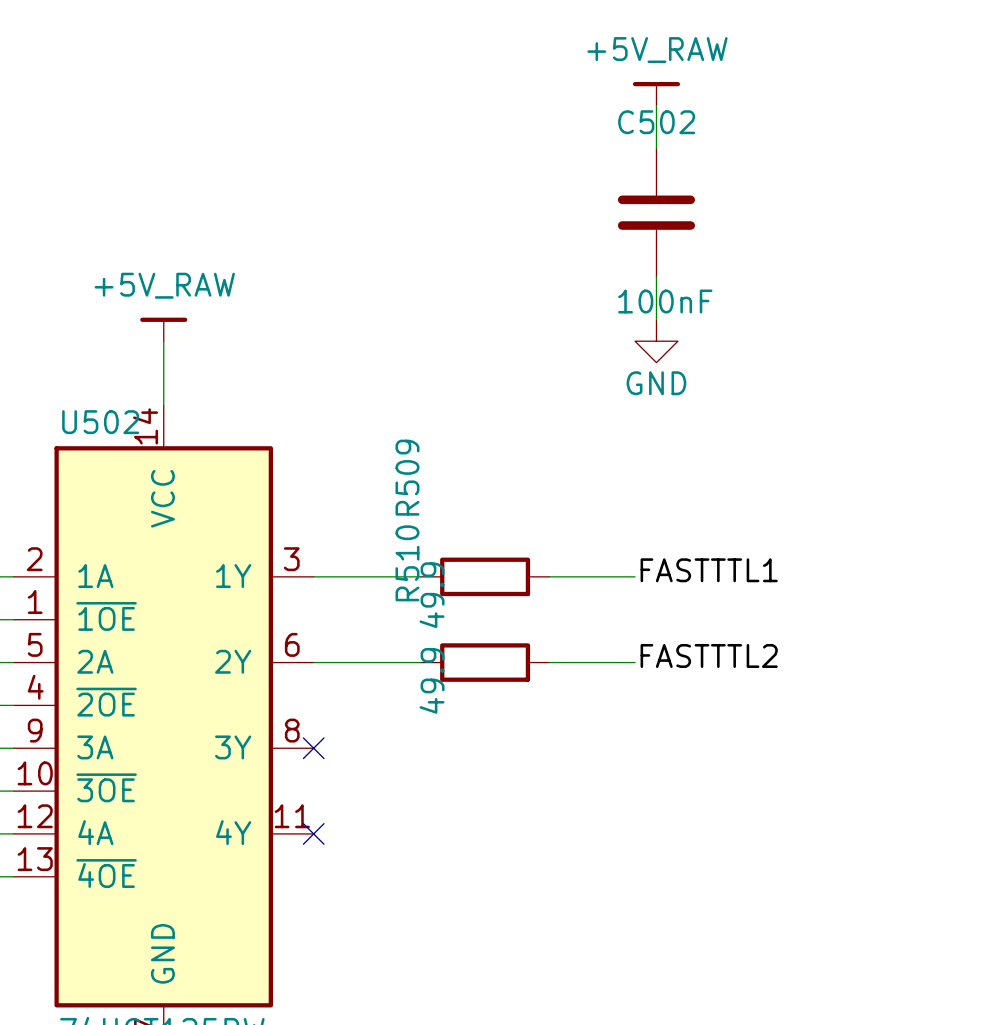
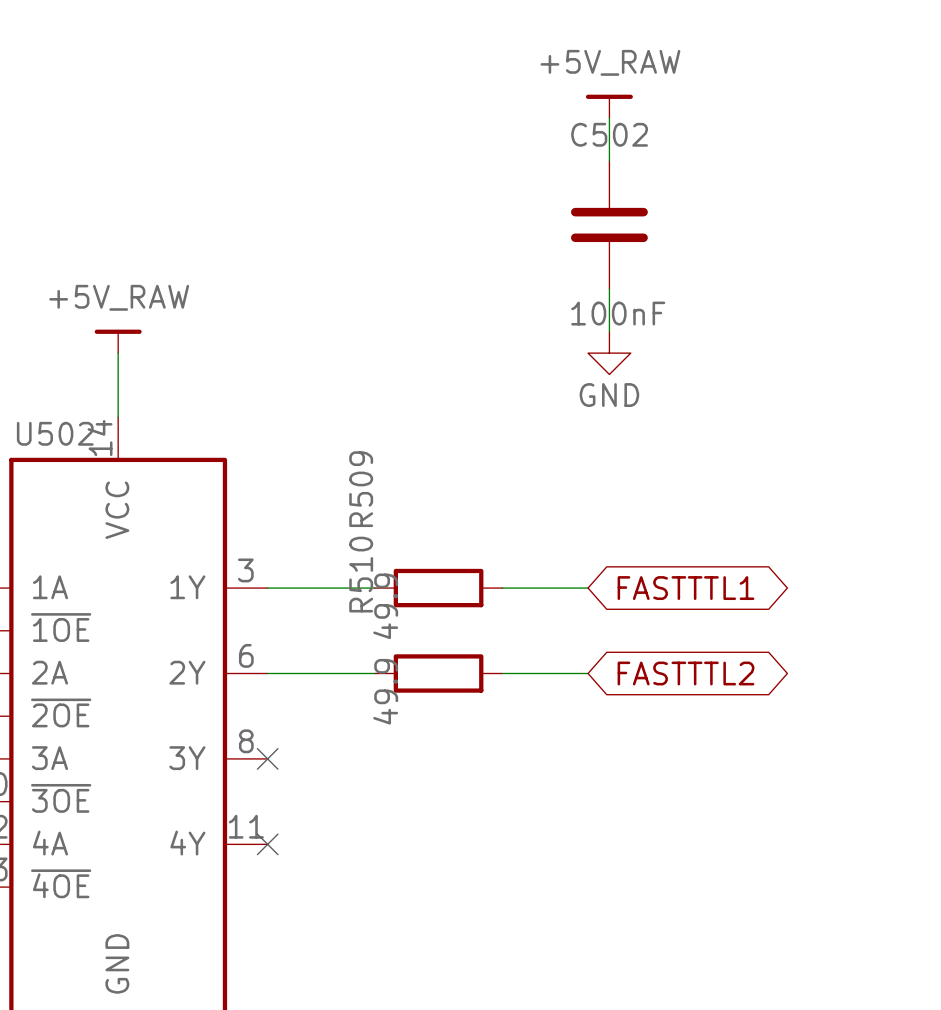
label: FASTTTL1 (709, 570) -> none
global label: none -> FASTTTL1 (685, 588)
label: FASTTTL2 (709, 655) -> none
global label: none -> FASTTTL2 (685, 673)

